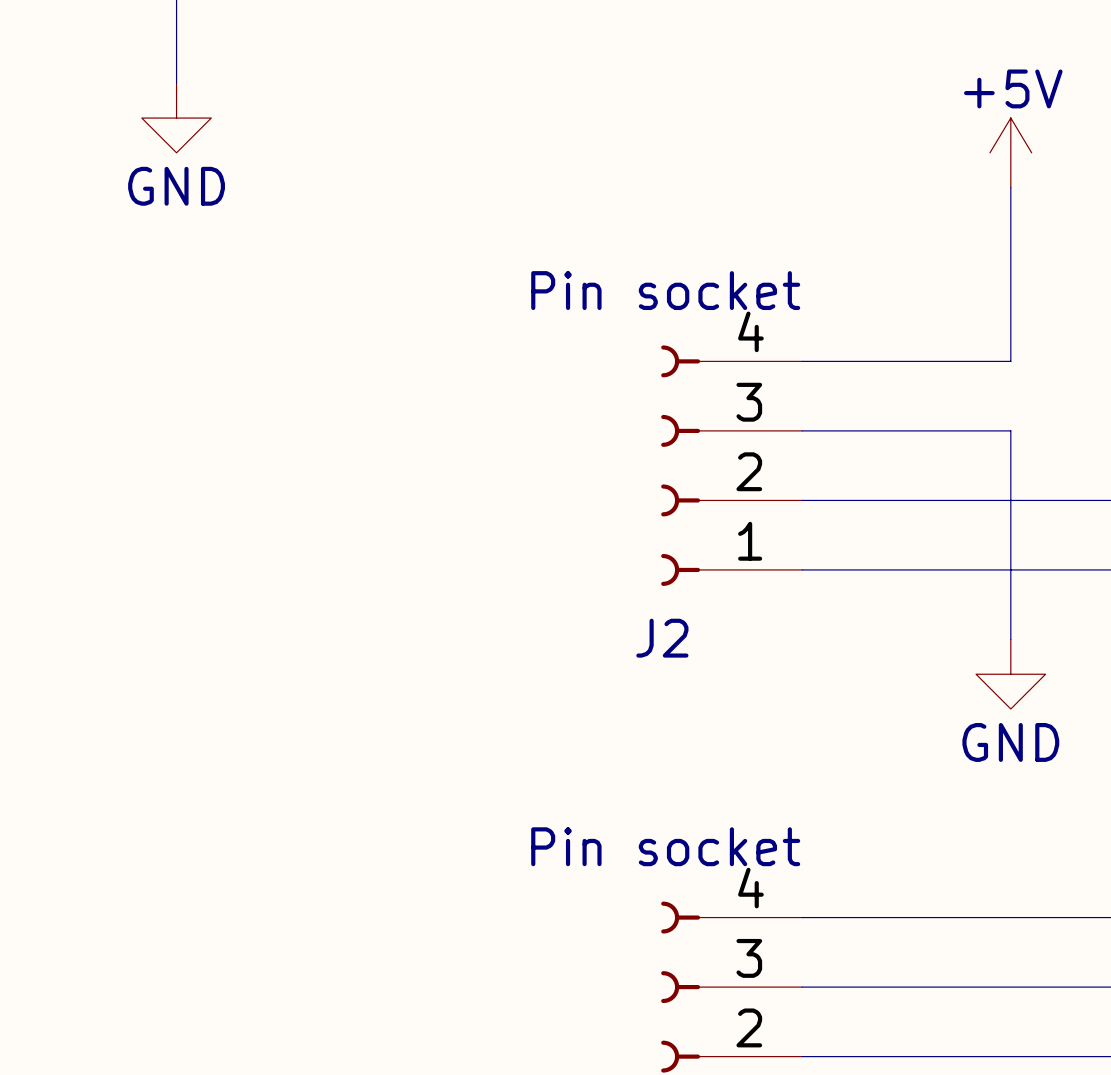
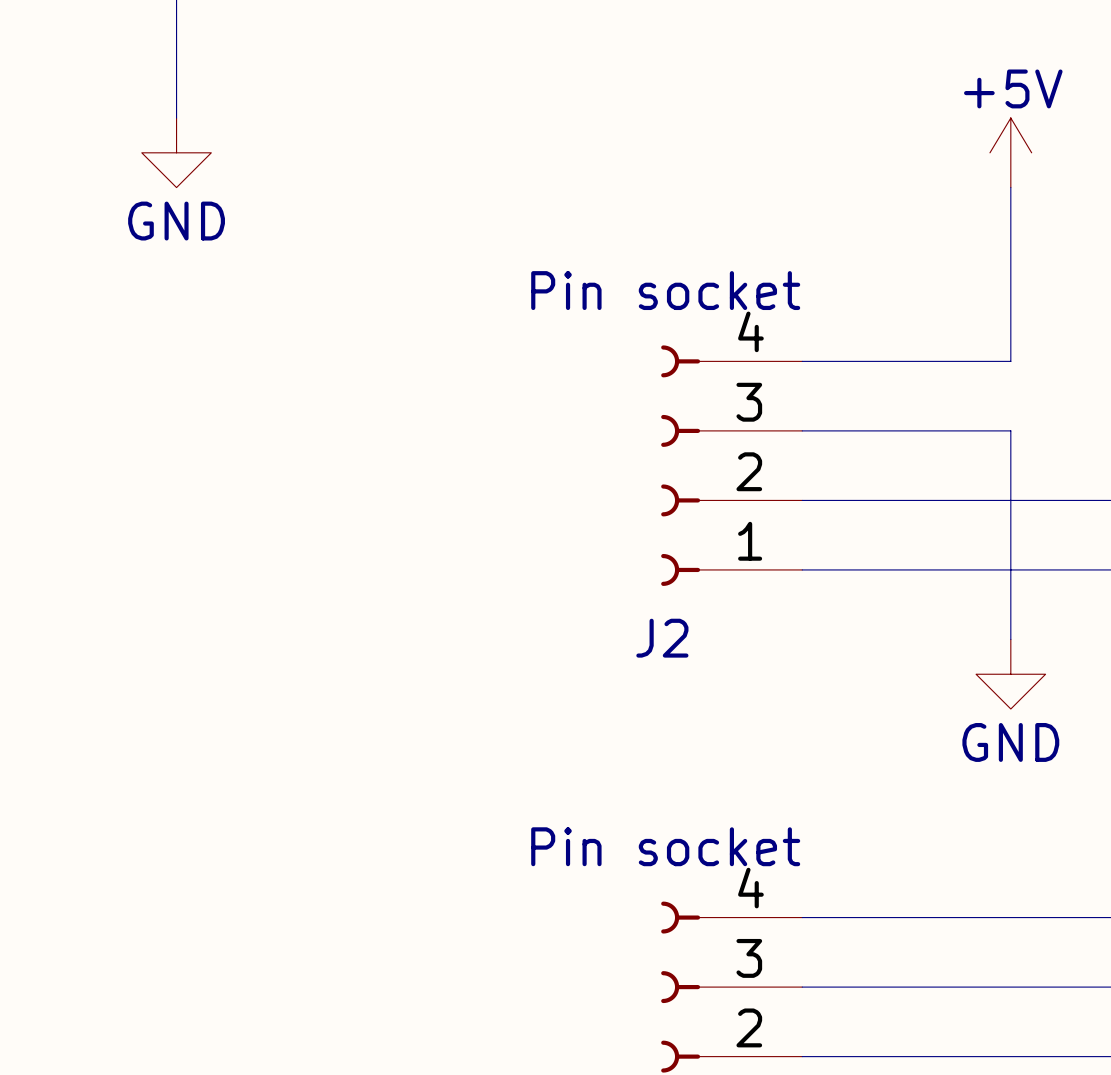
power symbol position: GND (176, 118) -> GND (176, 152)

